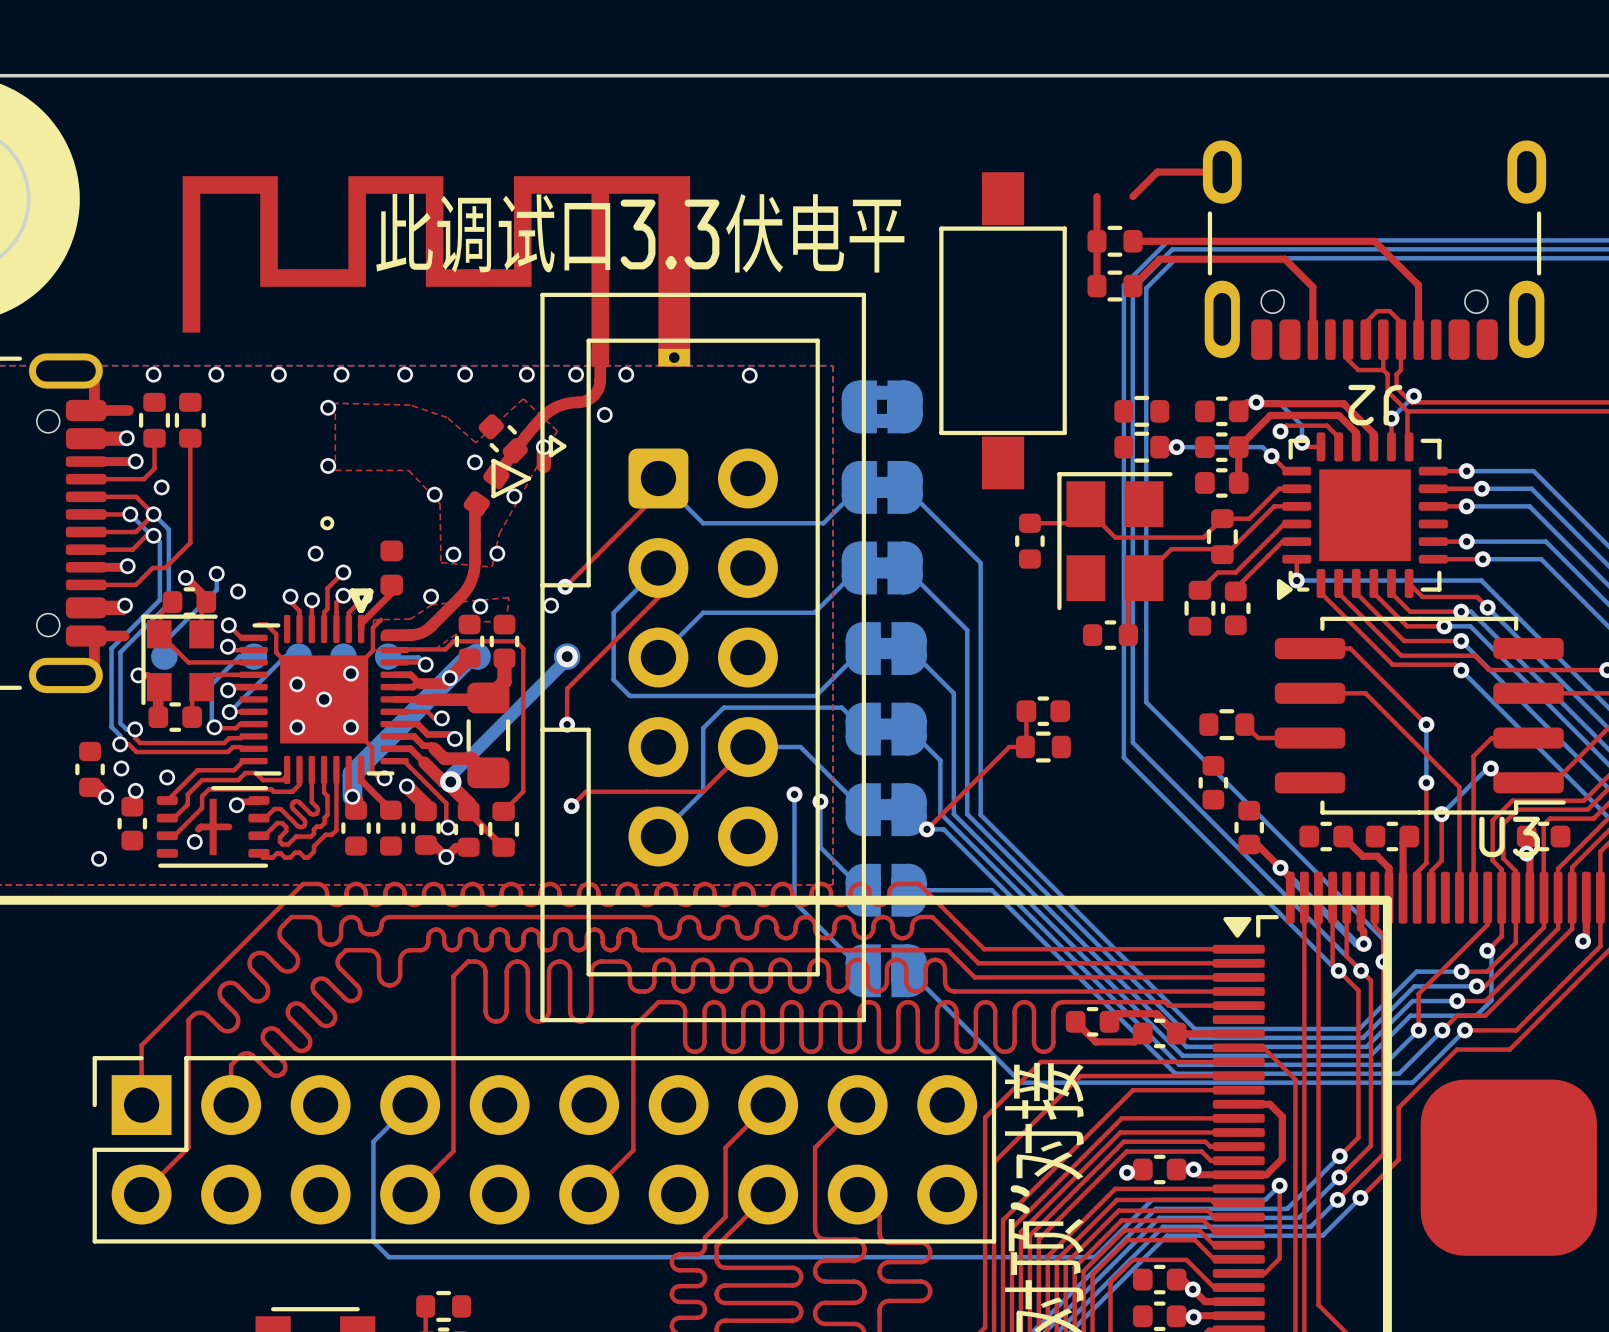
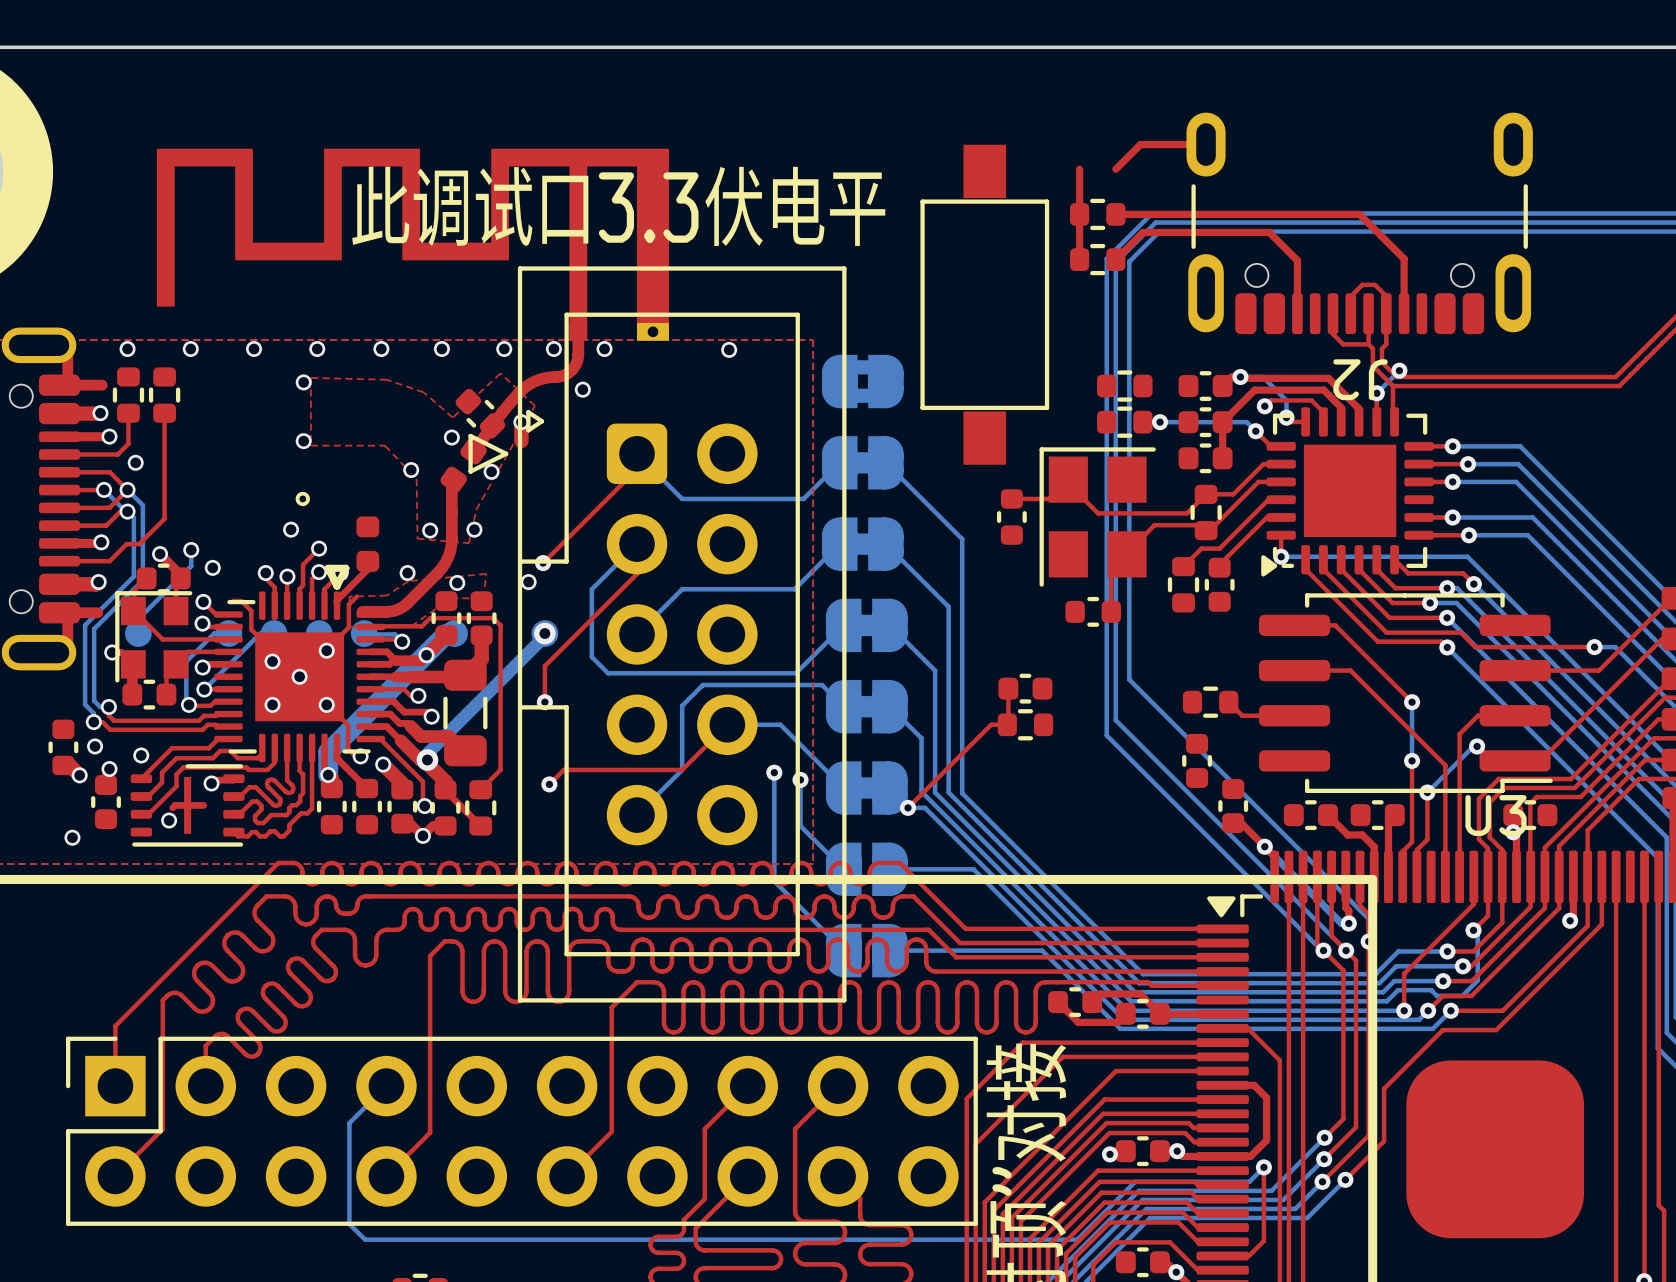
bottom track: (909, 970) (1020, 1082) (1412, 1082) (1447, 1048) -> (889, 950) (1042, 950) (1120, 1028) (1432, 1028)
bottom track: (1416, 971) (1359, 1028) (1194, 1028) (1159, 994) -> (1402, 951) (1398, 951) (1375, 974) (1143, 974)
bottom track: (1414, 986) (1363, 1037) (1191, 1037) (1156, 1003) -> (1400, 966) (1396, 966) (1379, 983) (1139, 983)
bottom track: (1412, 1001) (1366, 1046) (1186, 1046) (1151, 1012) -> (1398, 981) (1394, 981) (1383, 992) (1134, 992)
bottom track: (1451, 1015) (1410, 1015) (1370, 1055) (1182, 1055) (1148, 1021) -> (1437, 995) (1431, 990) (1398, 990) (1386, 1001) (1131, 1001)
bottom track: (1144, 1030) (1179, 1064) (1384, 1064) (1418, 1030) -> (1127, 1010) (1398, 1010) (1404, 1004)
bottom track: (1141, 1039) (1175, 1073) (1399, 1073) (1433, 1039) -> (1124, 1019) (1419, 1019)

